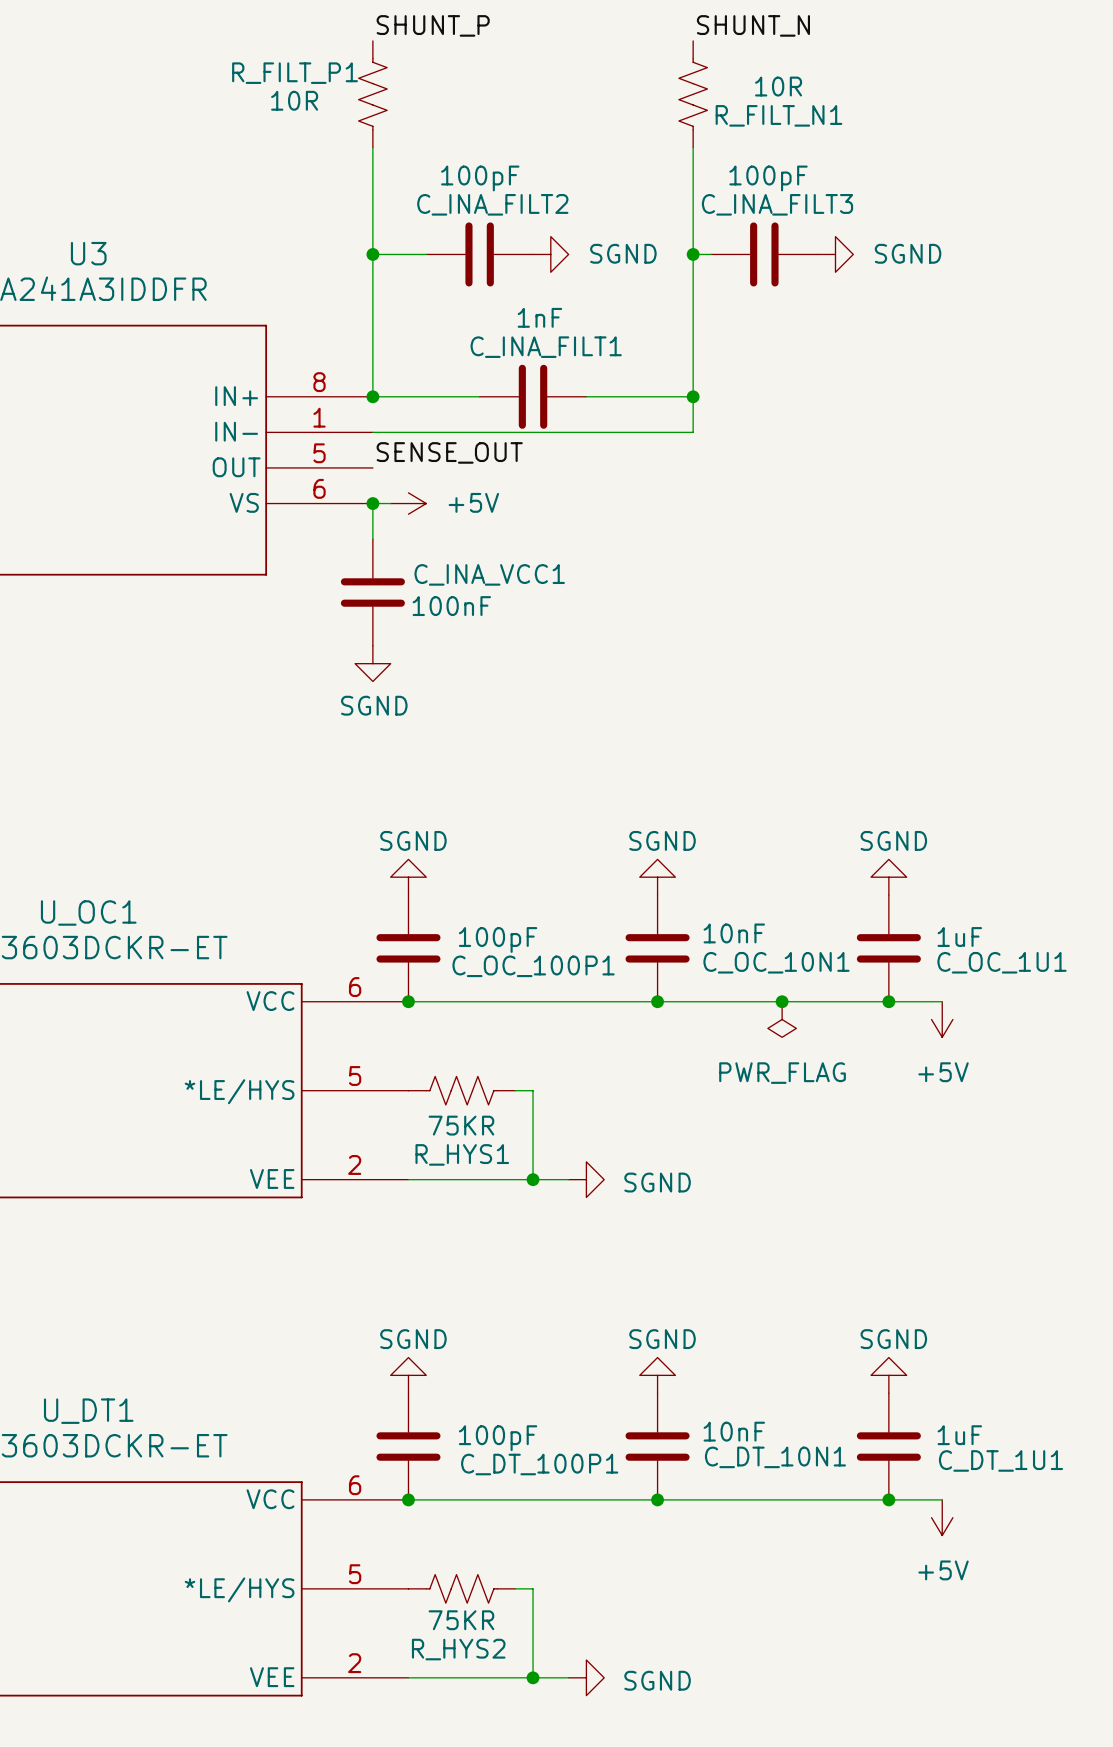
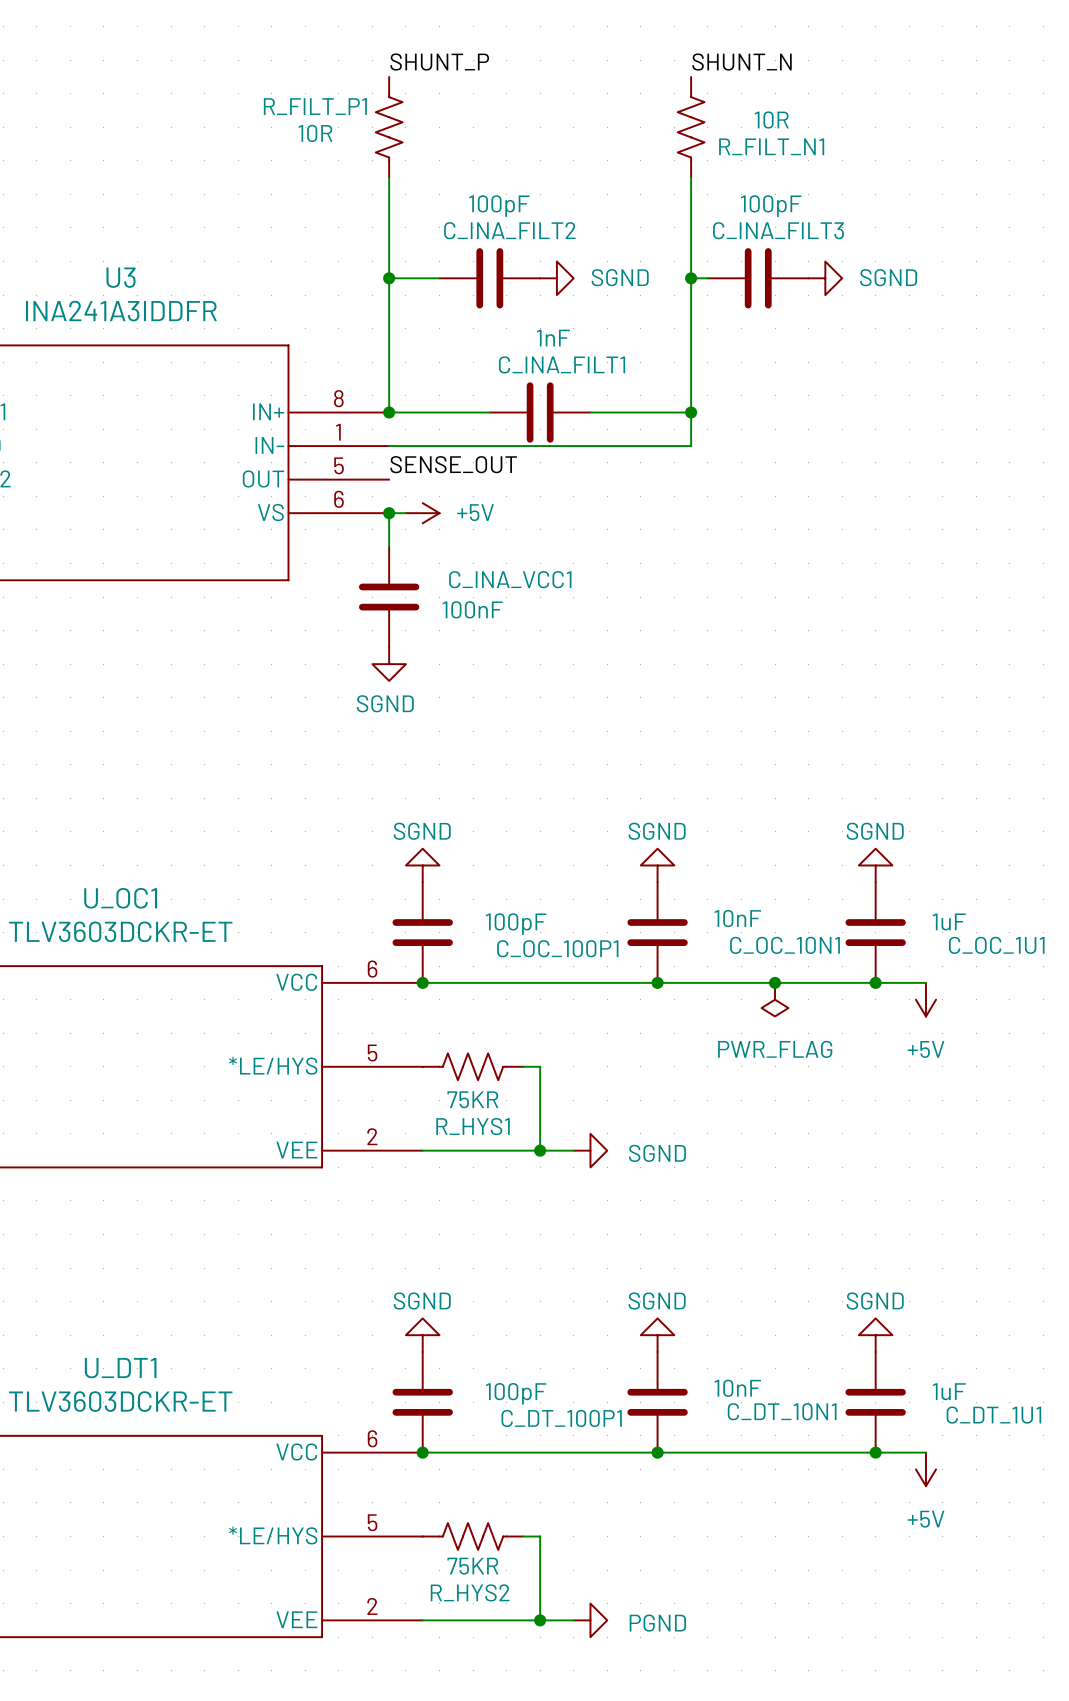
power symbol: SGND (586, 1677) -> PGND (590, 1620)

